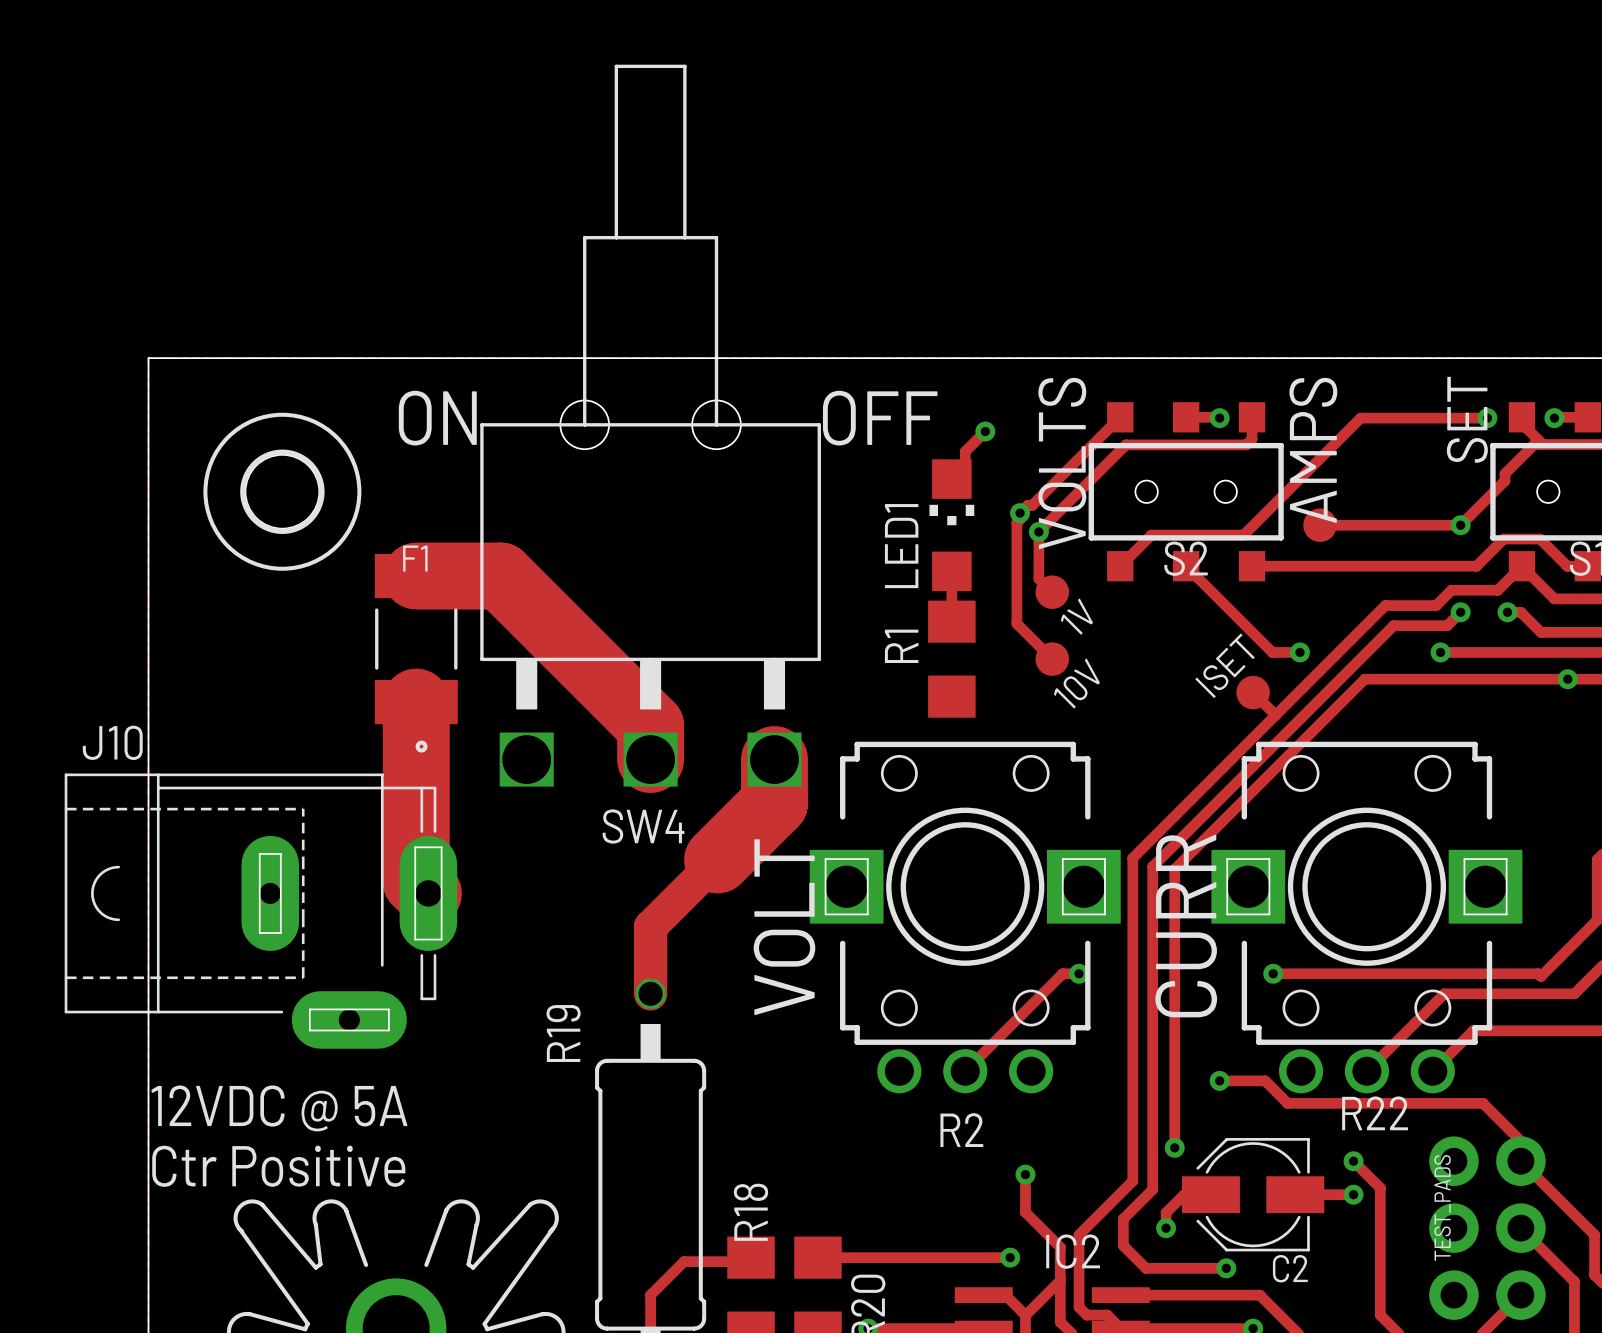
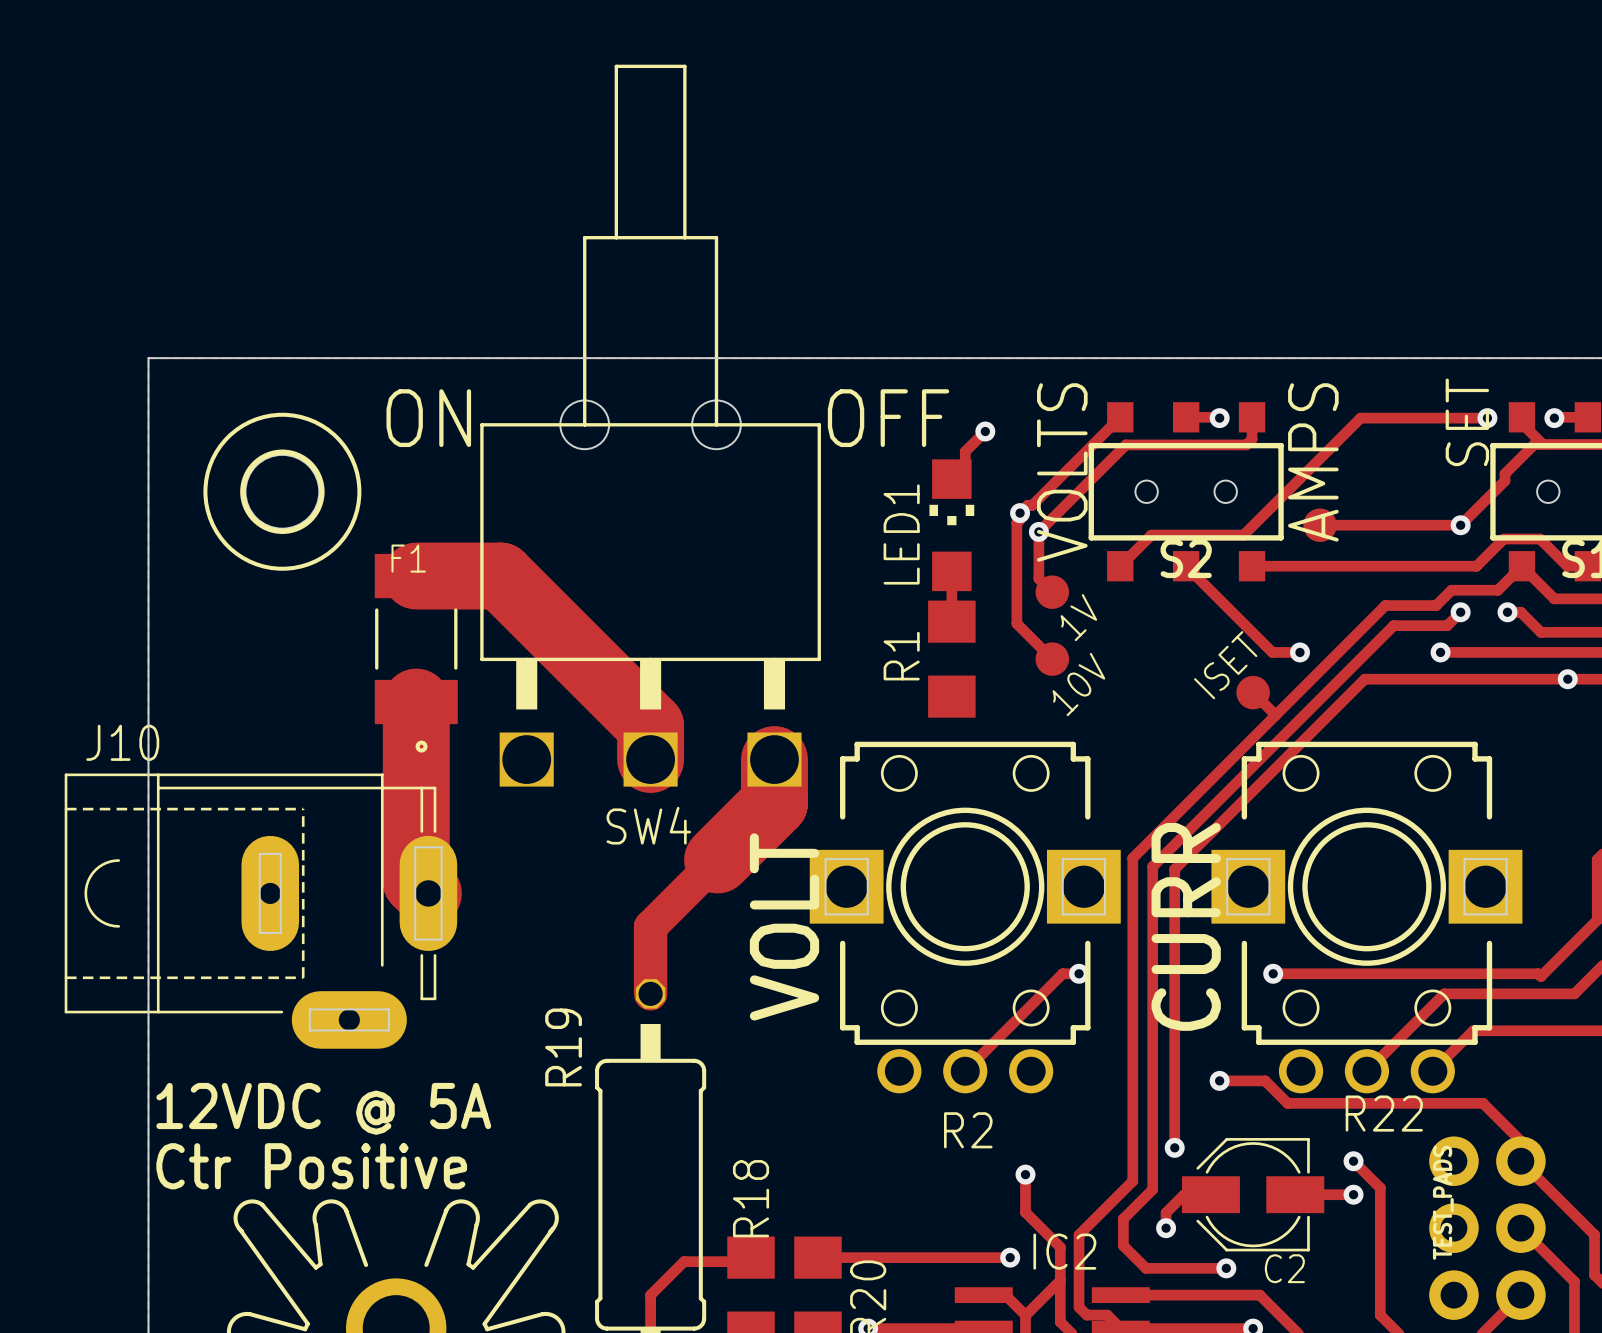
J10 footprint: [64, 773, 458, 1049] -> [64, 773, 458, 1049]

